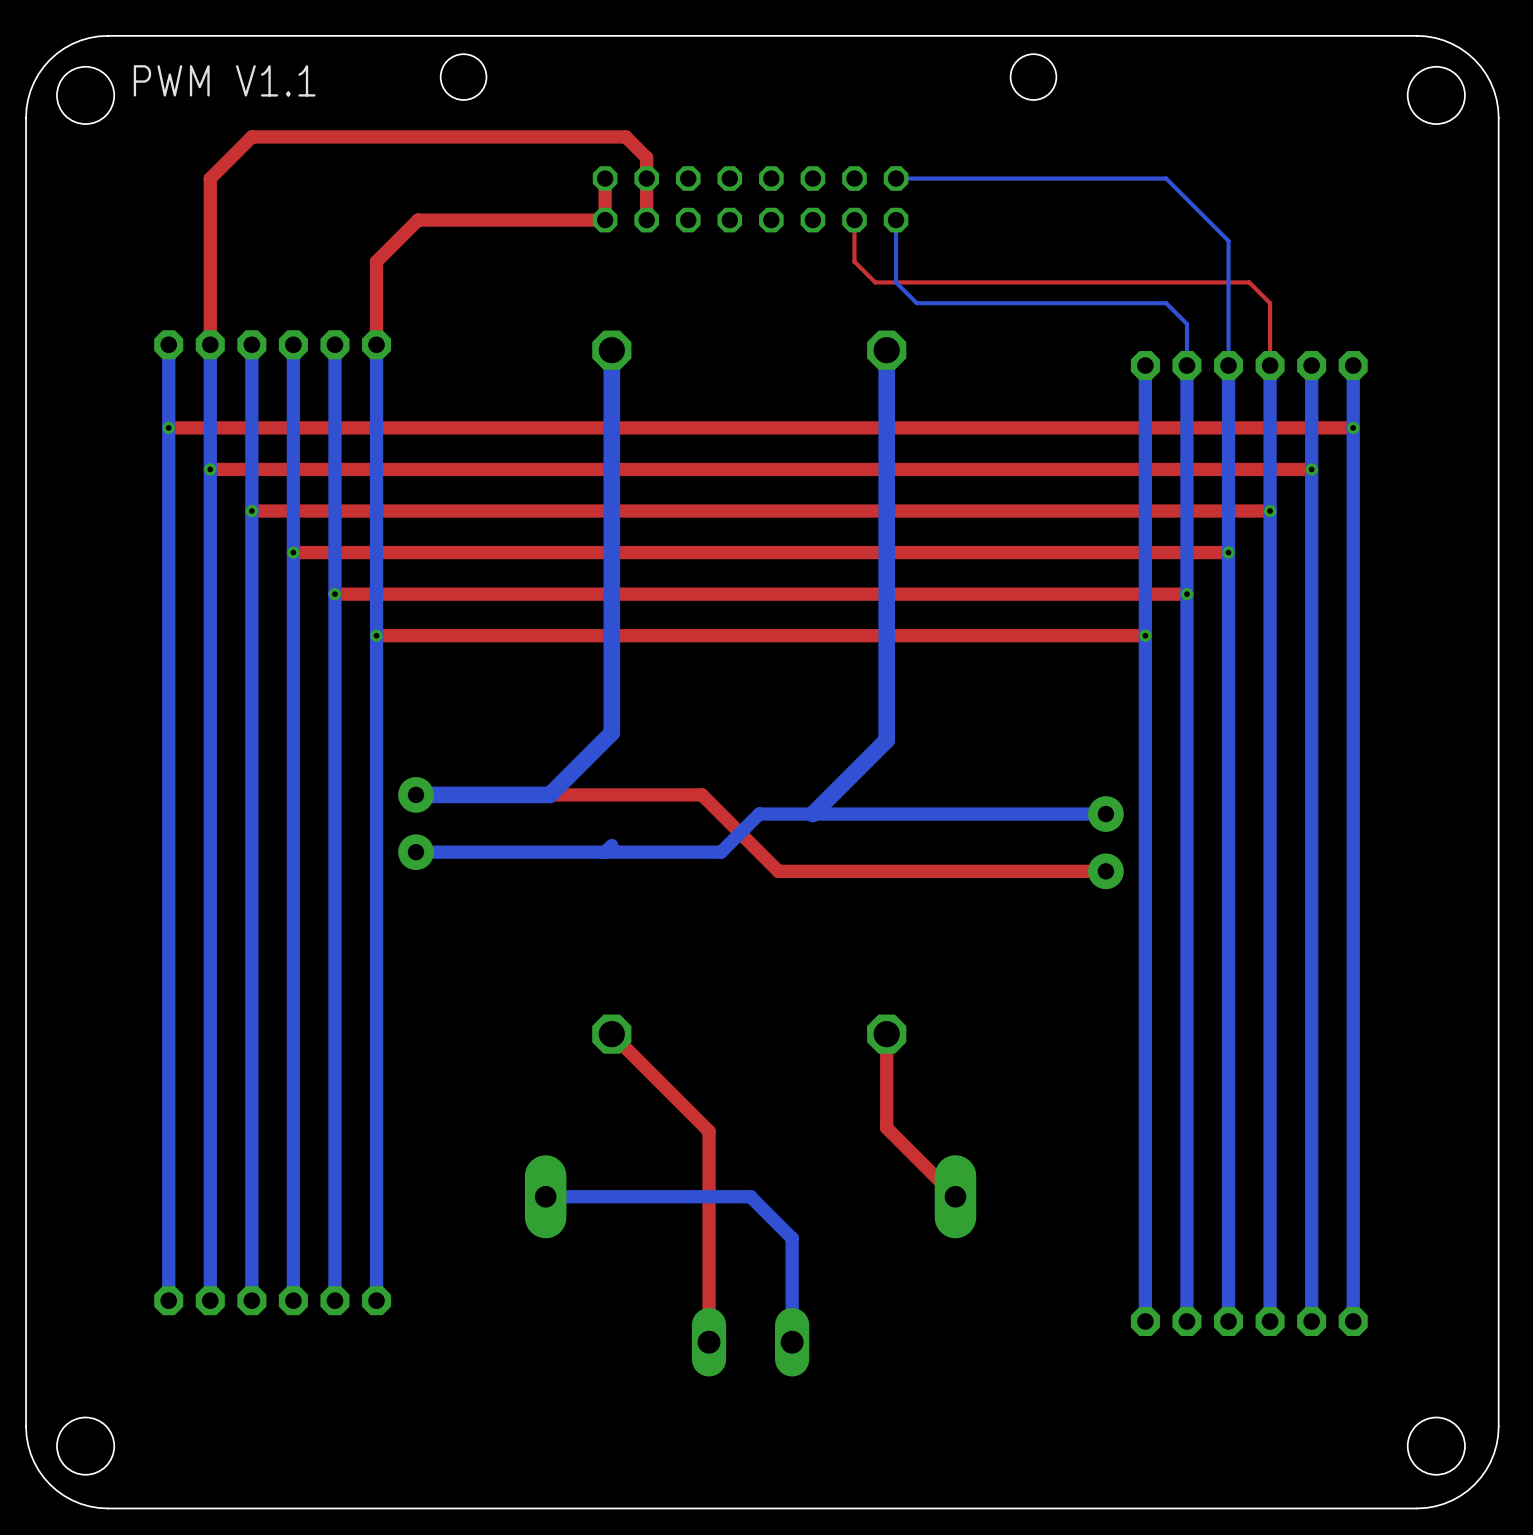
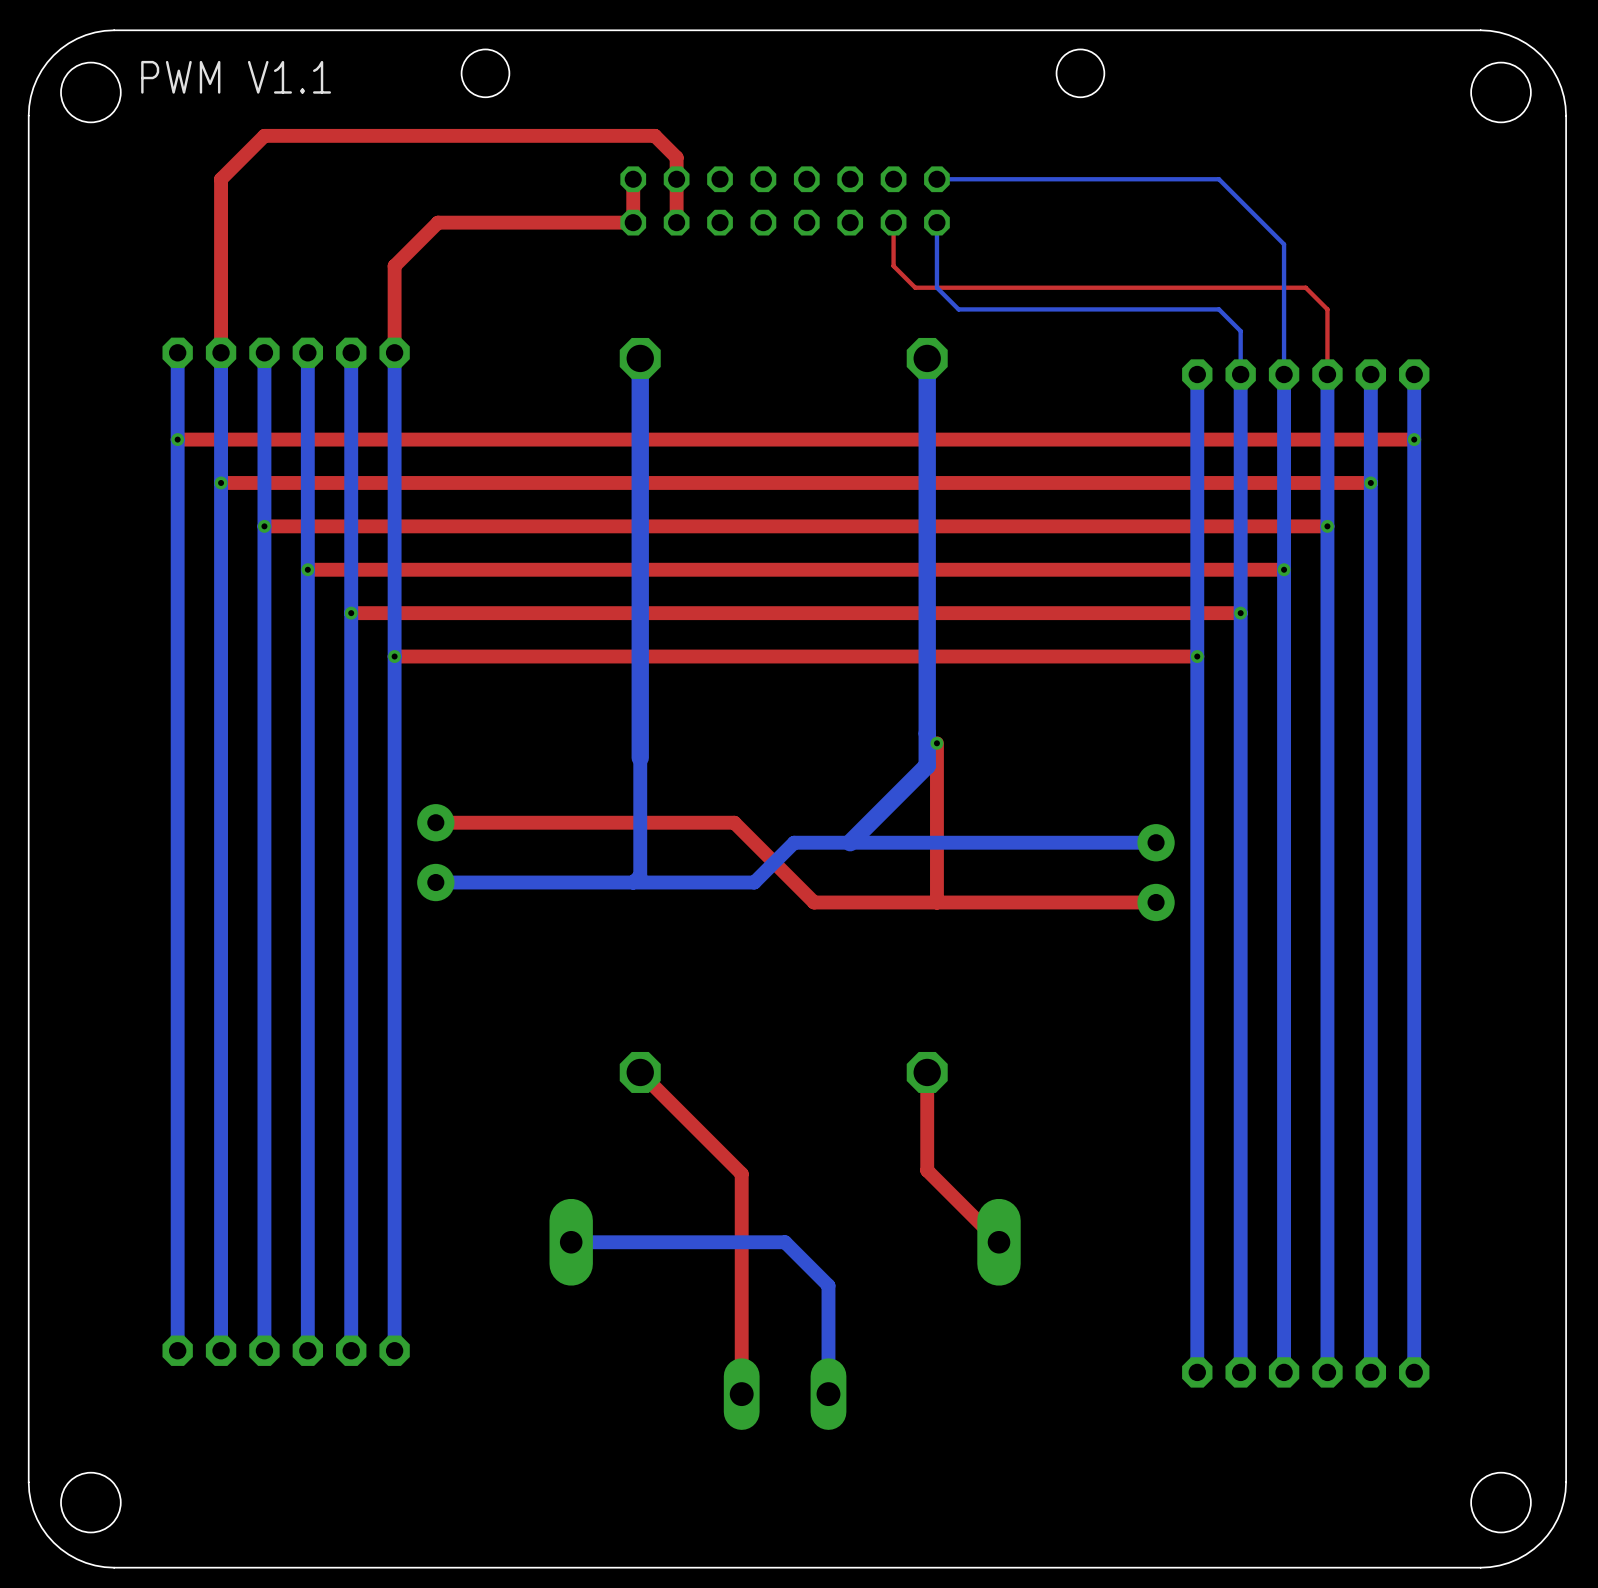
top track: none -> (936, 743) (936, 902)
via: none -> (936, 743)
bottom track: (611, 732) (549, 794) (416, 794) -> (640, 757) (640, 875)

